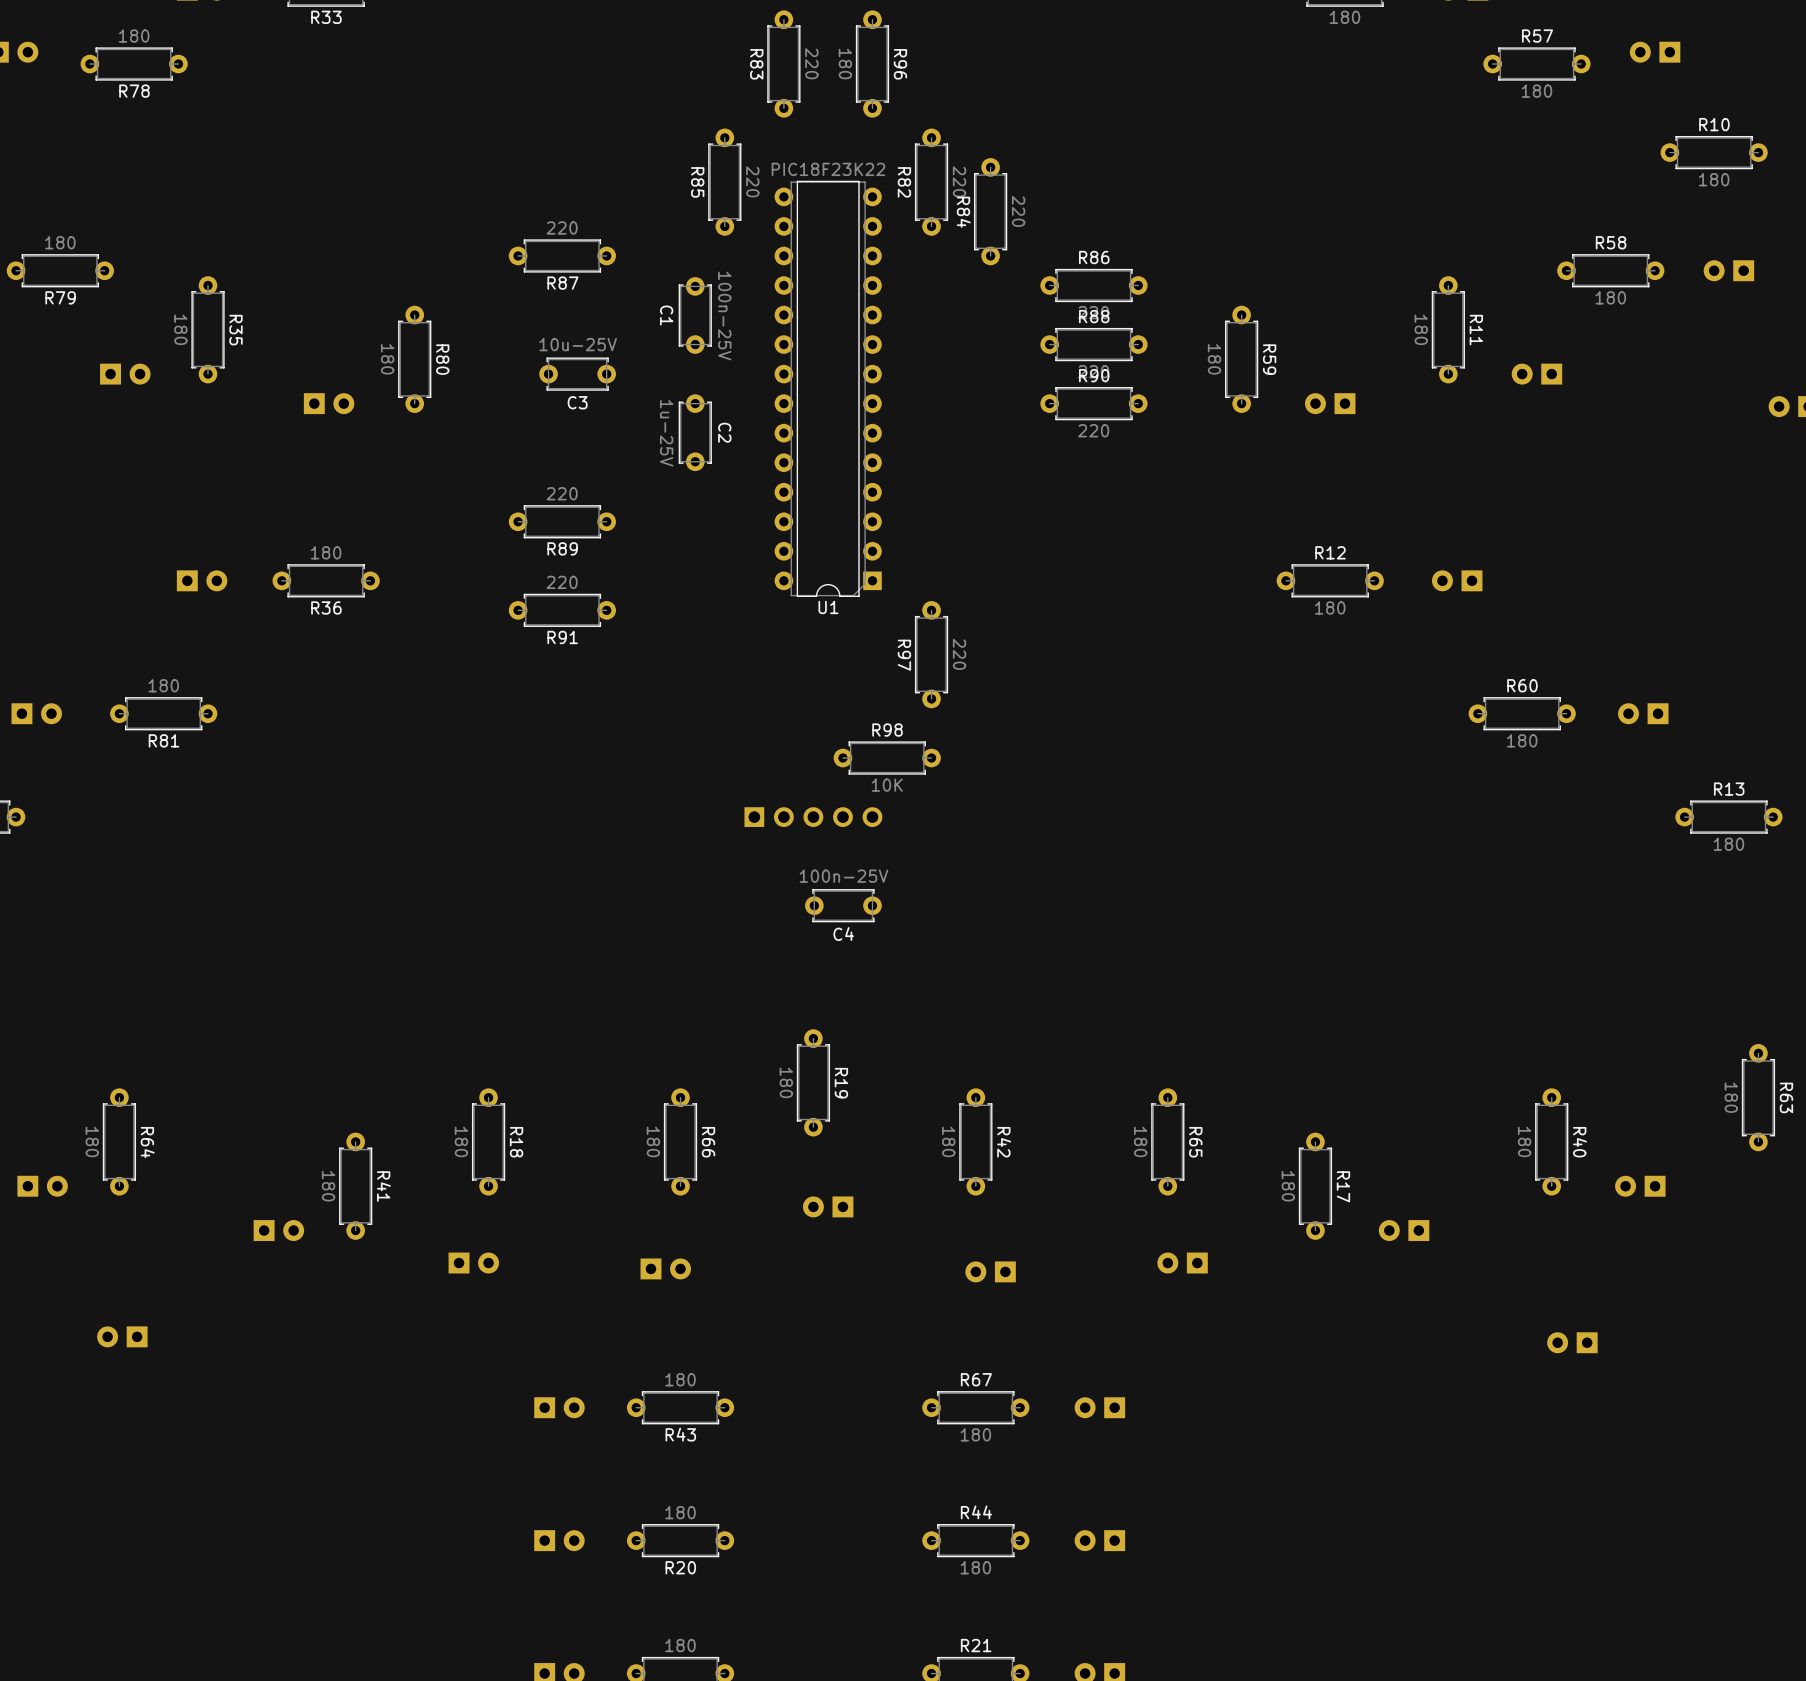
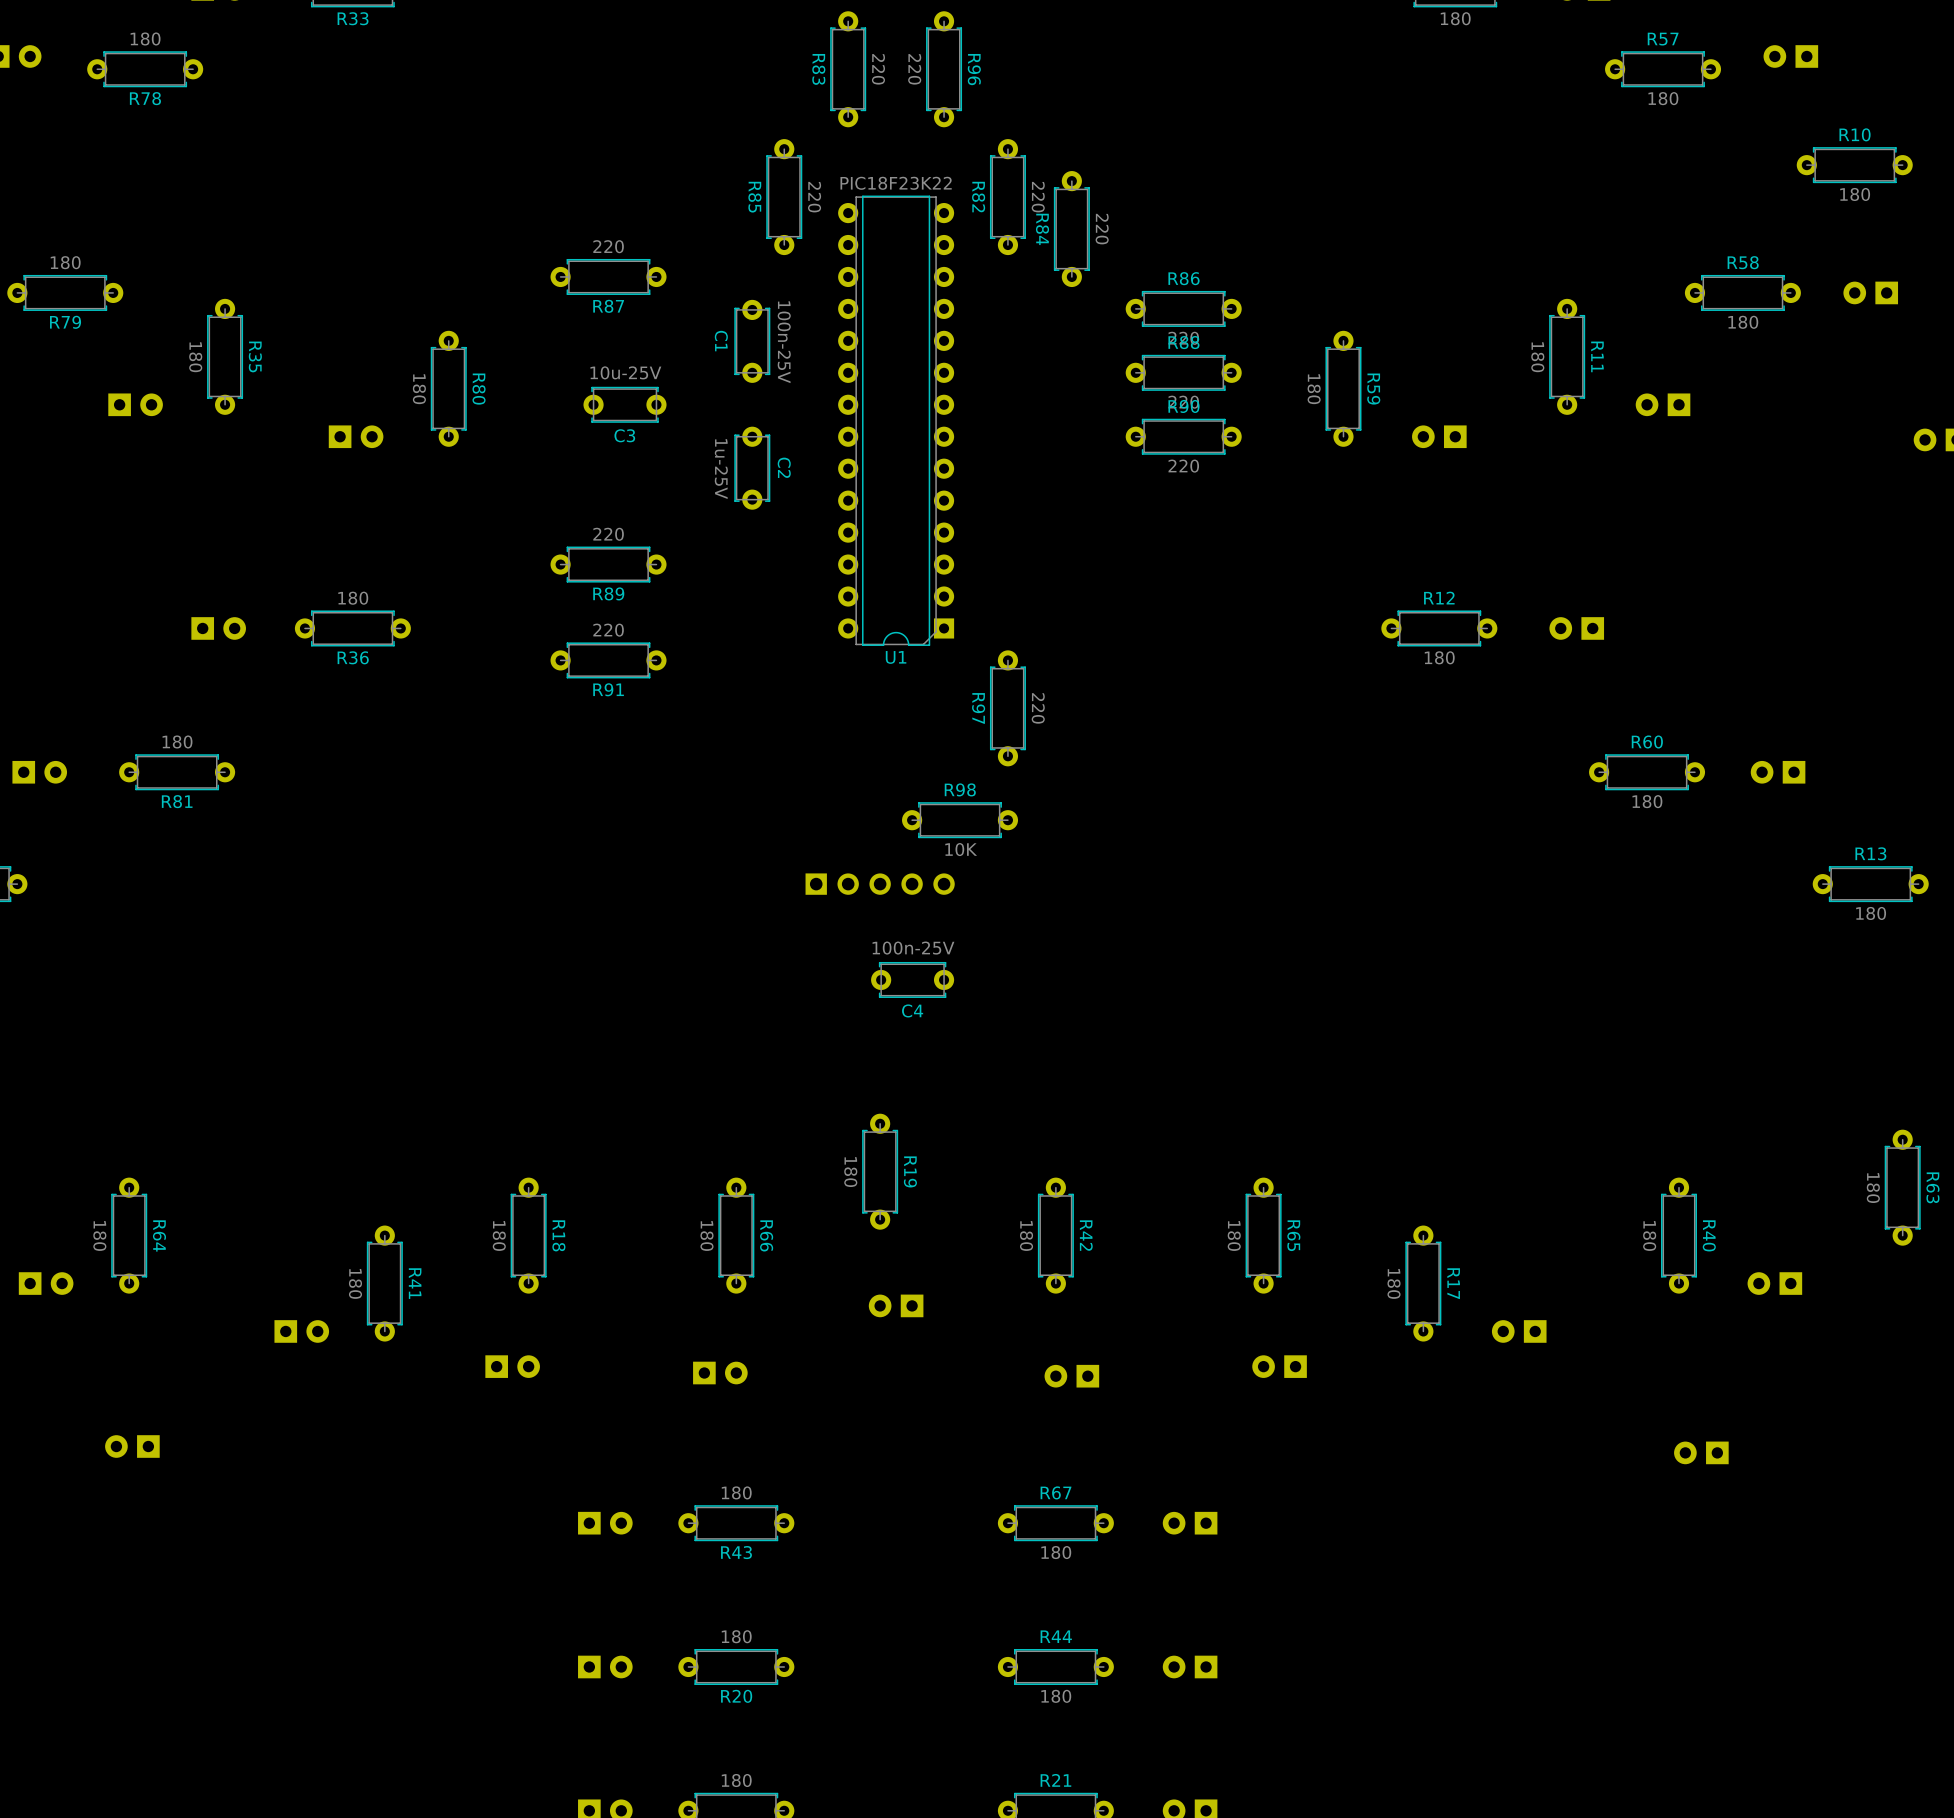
R96 value: 180 (845, 64) -> 220 (914, 69)

